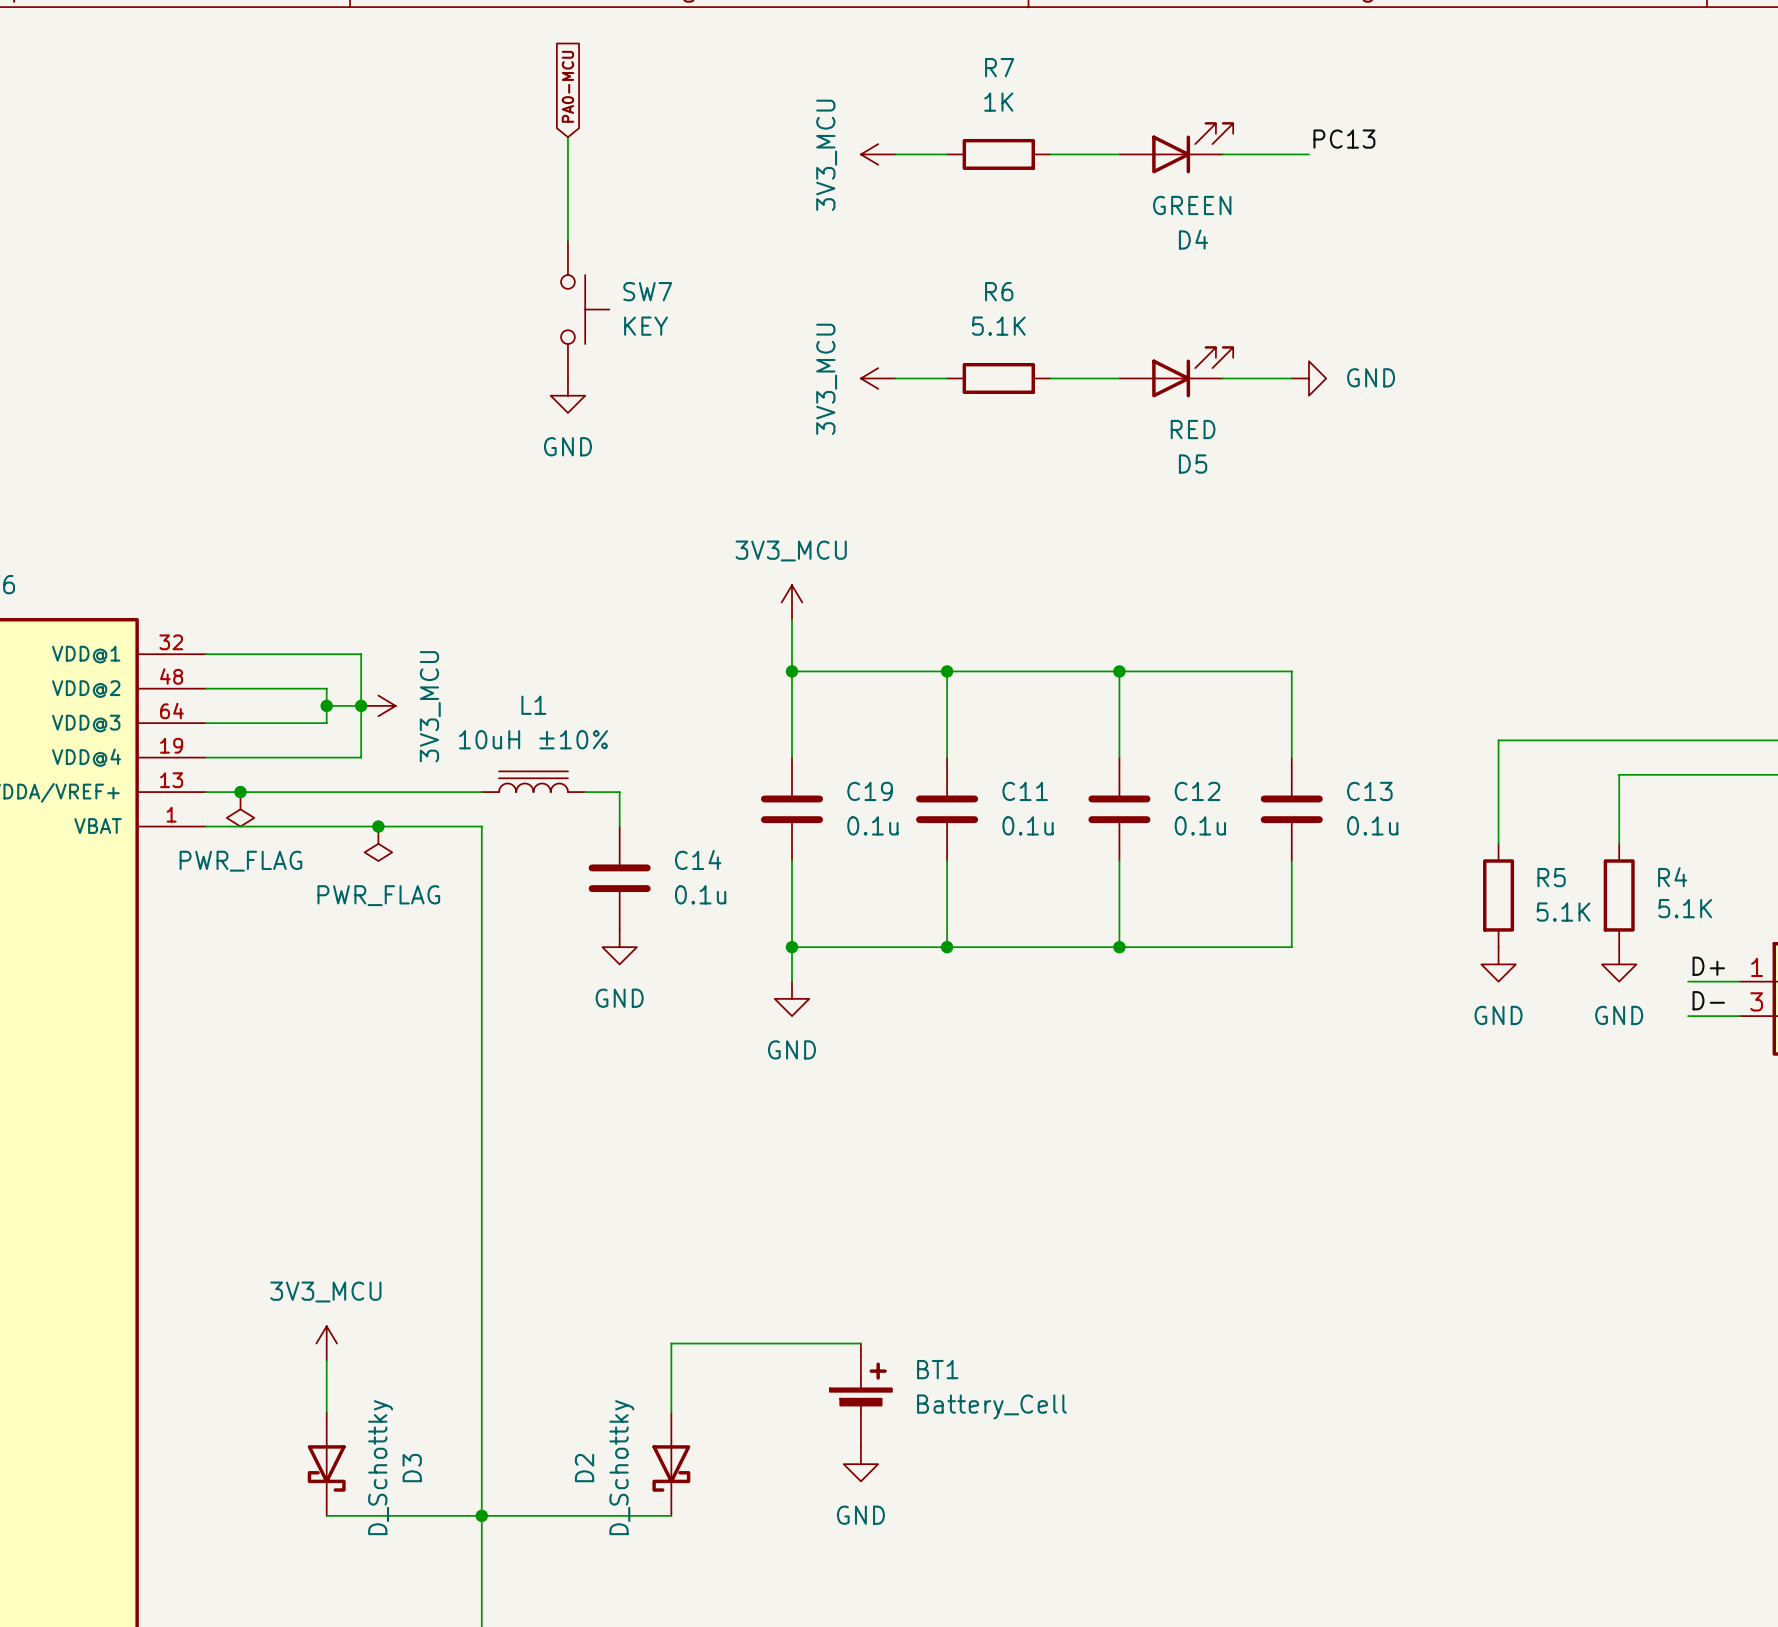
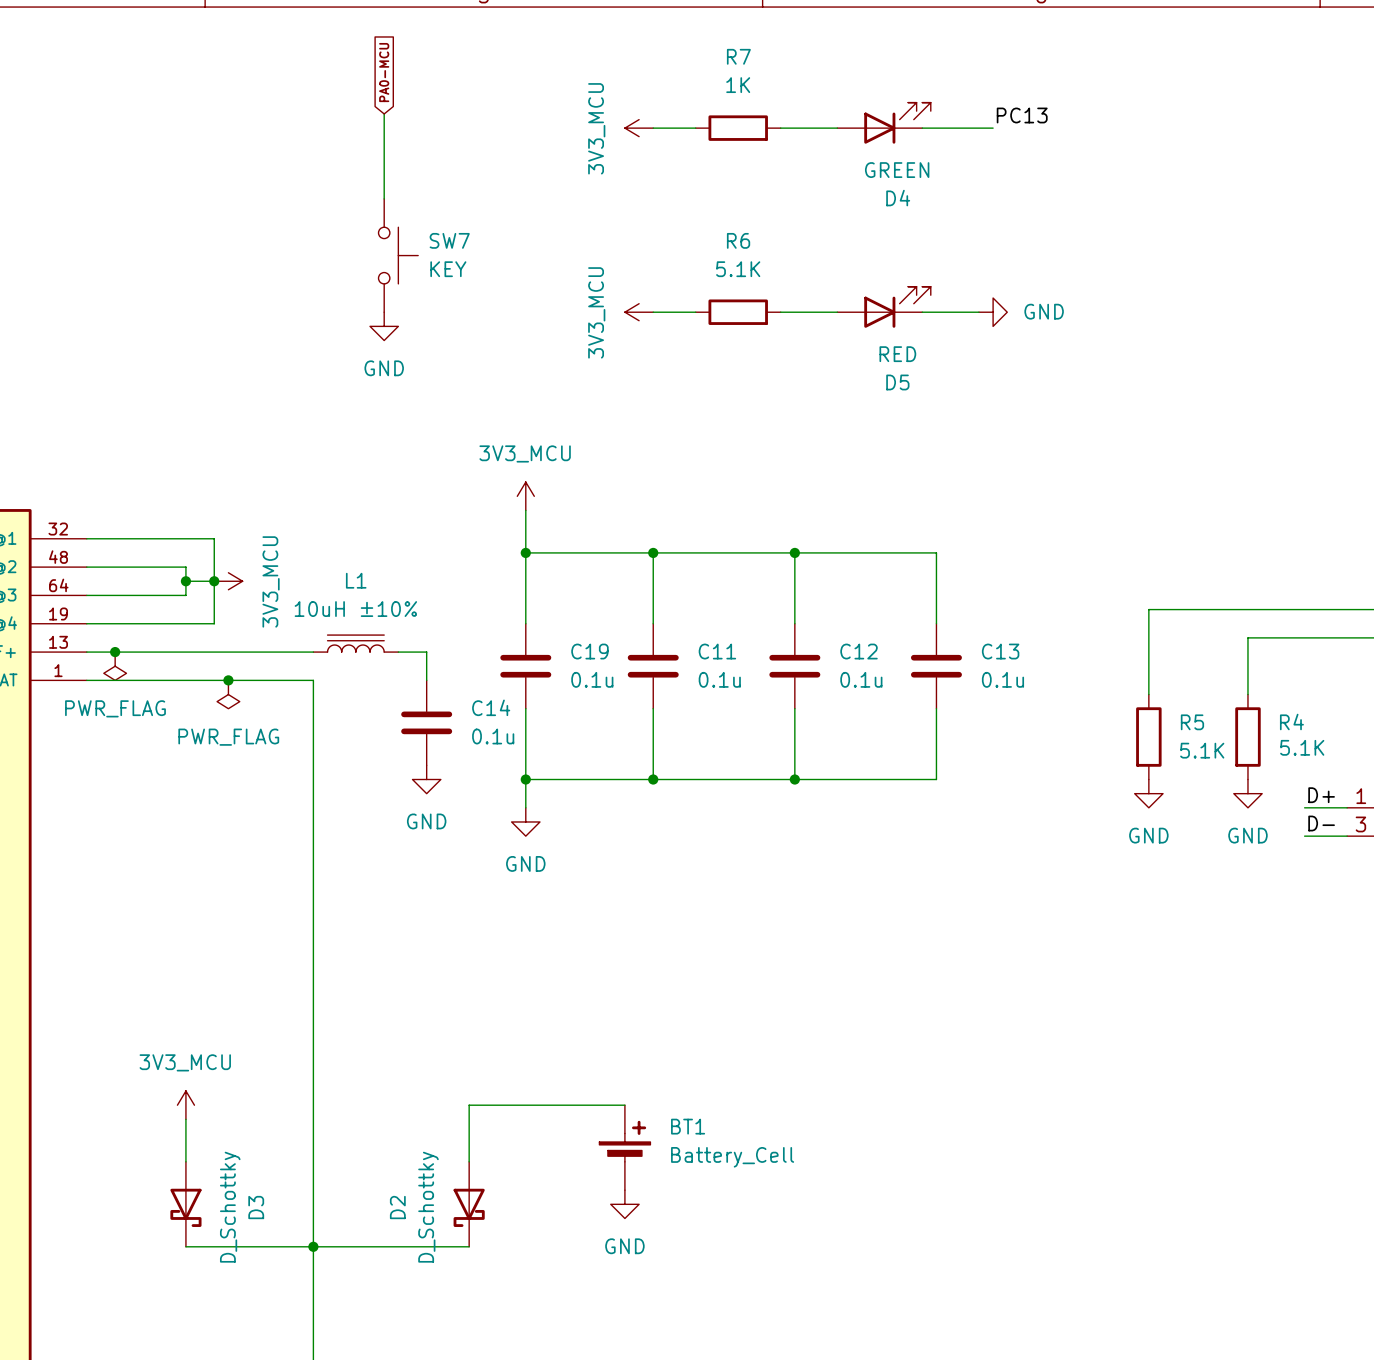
power symbol position: 3V3_MCU (791, 602) -> 3V3_MCU (525, 496)
wire: (791, 619) (791, 757) -> (525, 510) (525, 623)
wire: none -> (525, 552) (568, 552)
junction: none -> (525, 552)
junction: (791, 671) -> none
junction: none -> (653, 552)
wire: (947, 671) (947, 757) -> (653, 552) (653, 623)
junction: (947, 671) -> none
wire: (1119, 671) (1119, 757) -> (794, 552) (794, 623)
junction position: (1119, 671) -> (794, 552)
wire: (1240, 671) (1291, 671) (1291, 757) -> (936, 552) (936, 623)
C19 position: (791, 809) -> (525, 666)
C11 position: (947, 809) -> (653, 666)
C12 position: (1119, 809) -> (794, 666)
C13 position: (1291, 809) -> (936, 666)
wire: (791, 861) (791, 981) -> (525, 708) (525, 807)
wire: (947, 861) (947, 947) -> (653, 708) (653, 779)
wire: (1119, 861) (1119, 947) -> (794, 708) (794, 779)
wire: (1291, 861) (1291, 947) (1240, 947) -> (936, 708) (936, 779)
wire: none -> (525, 779) (568, 779)
junction: none -> (525, 779)
junction: (791, 947) -> none
junction: none -> (653, 779)
junction: (947, 947) -> none
junction position: (1119, 947) -> (794, 779)
power symbol position: GND (791, 998) -> GND (525, 821)

